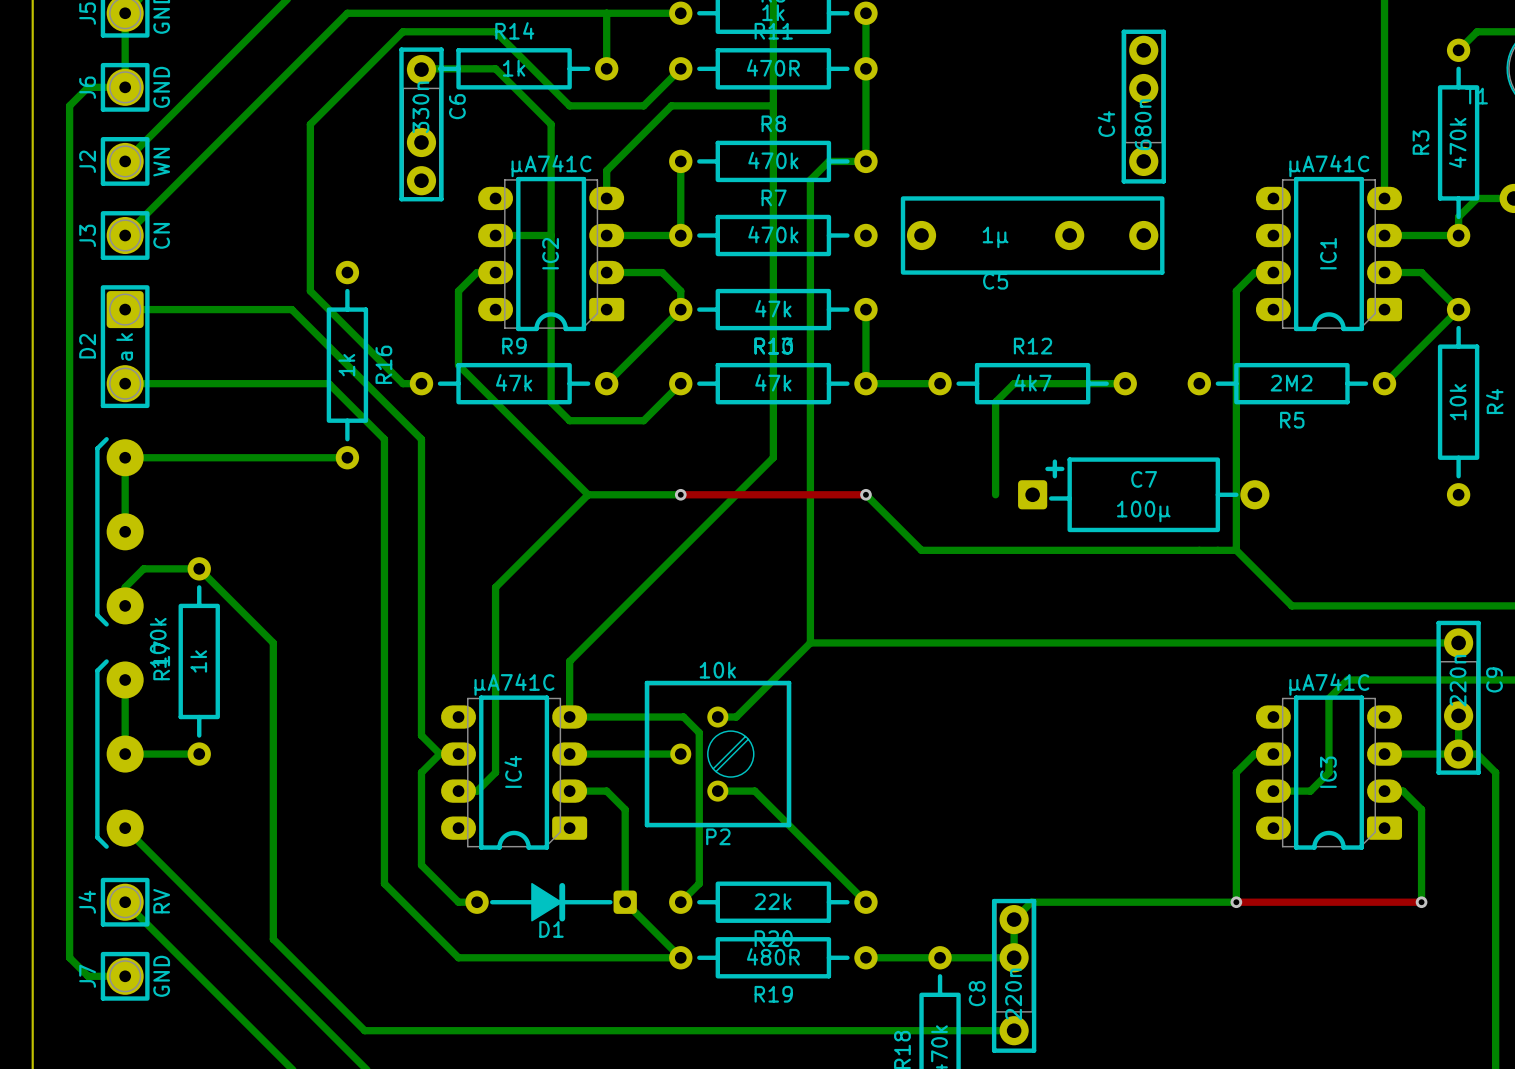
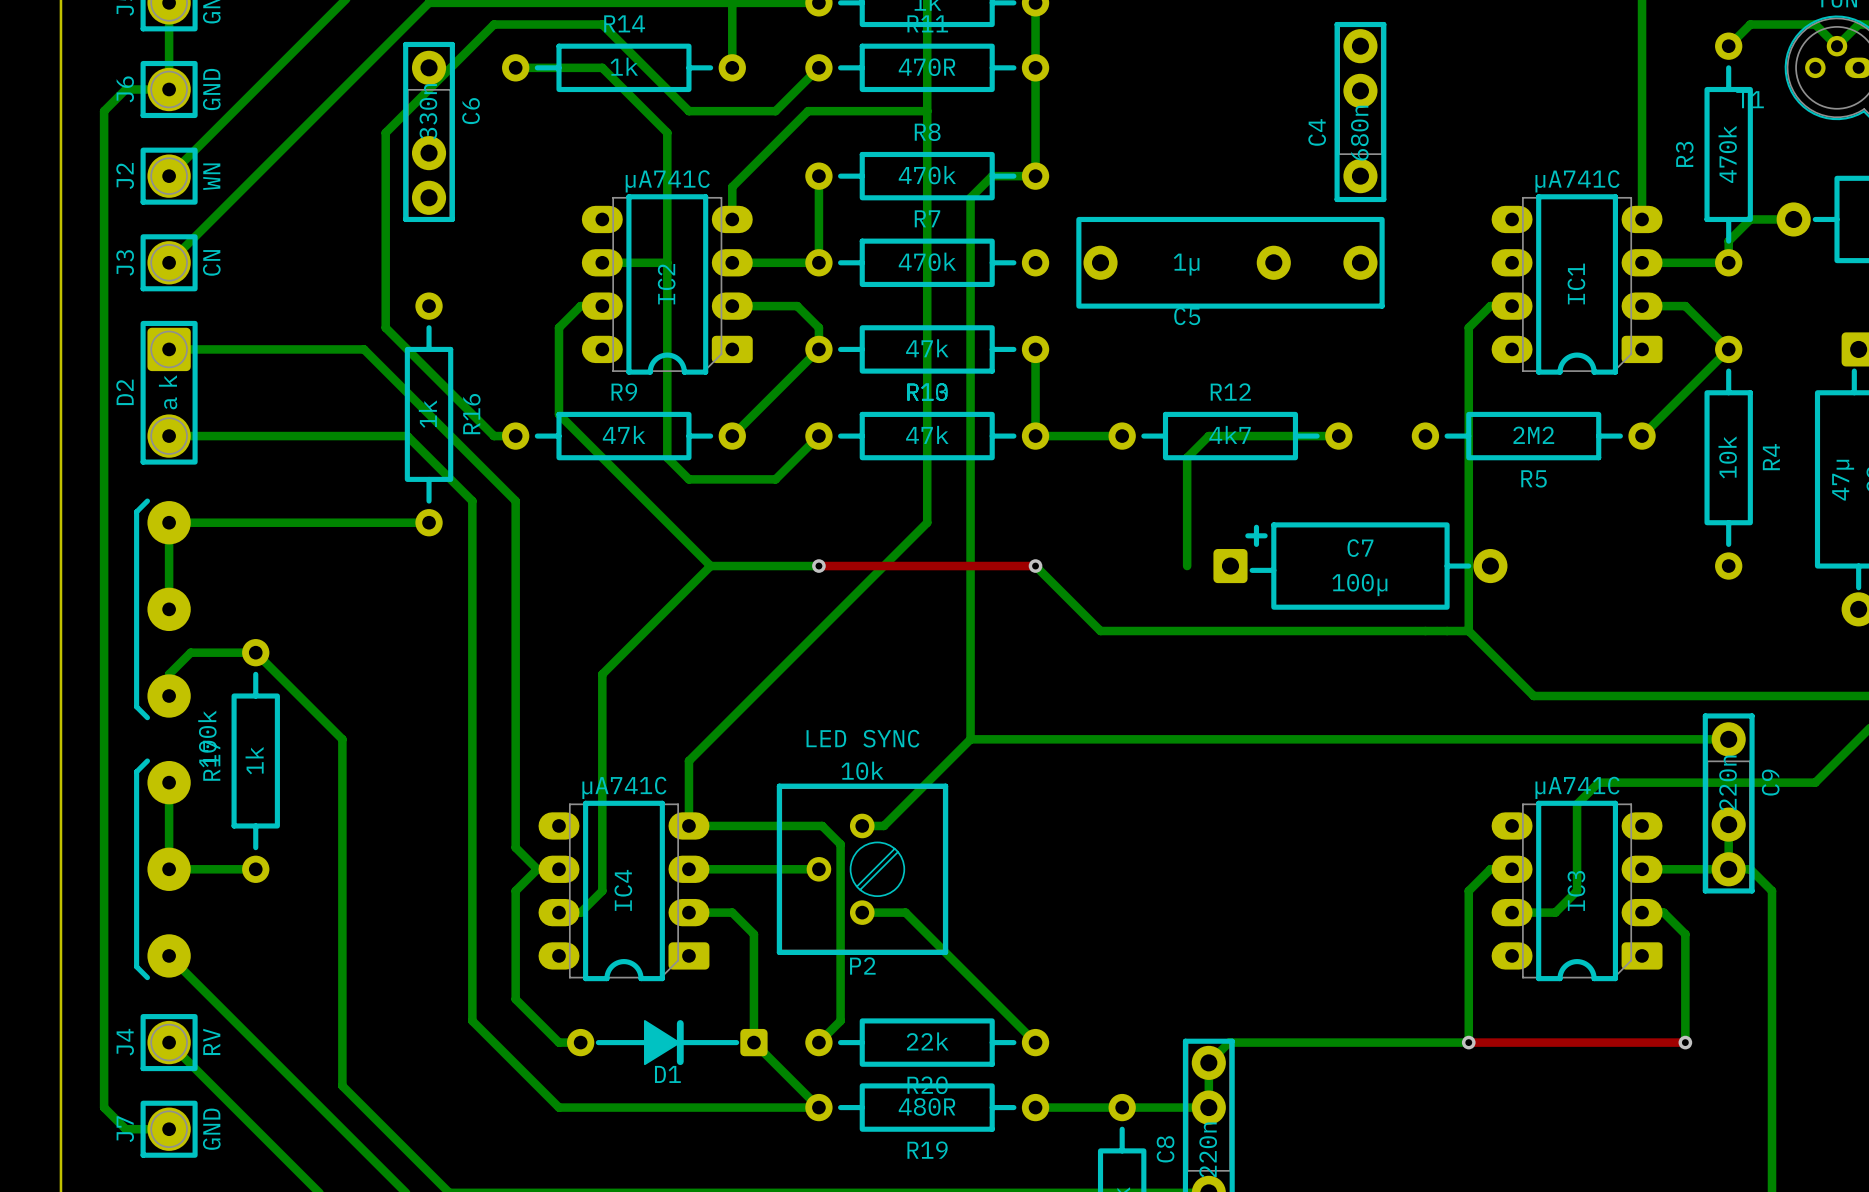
C6 position: (421, 124) -> (429, 131)
P2 text: none -> LED SYNC (862, 738)

